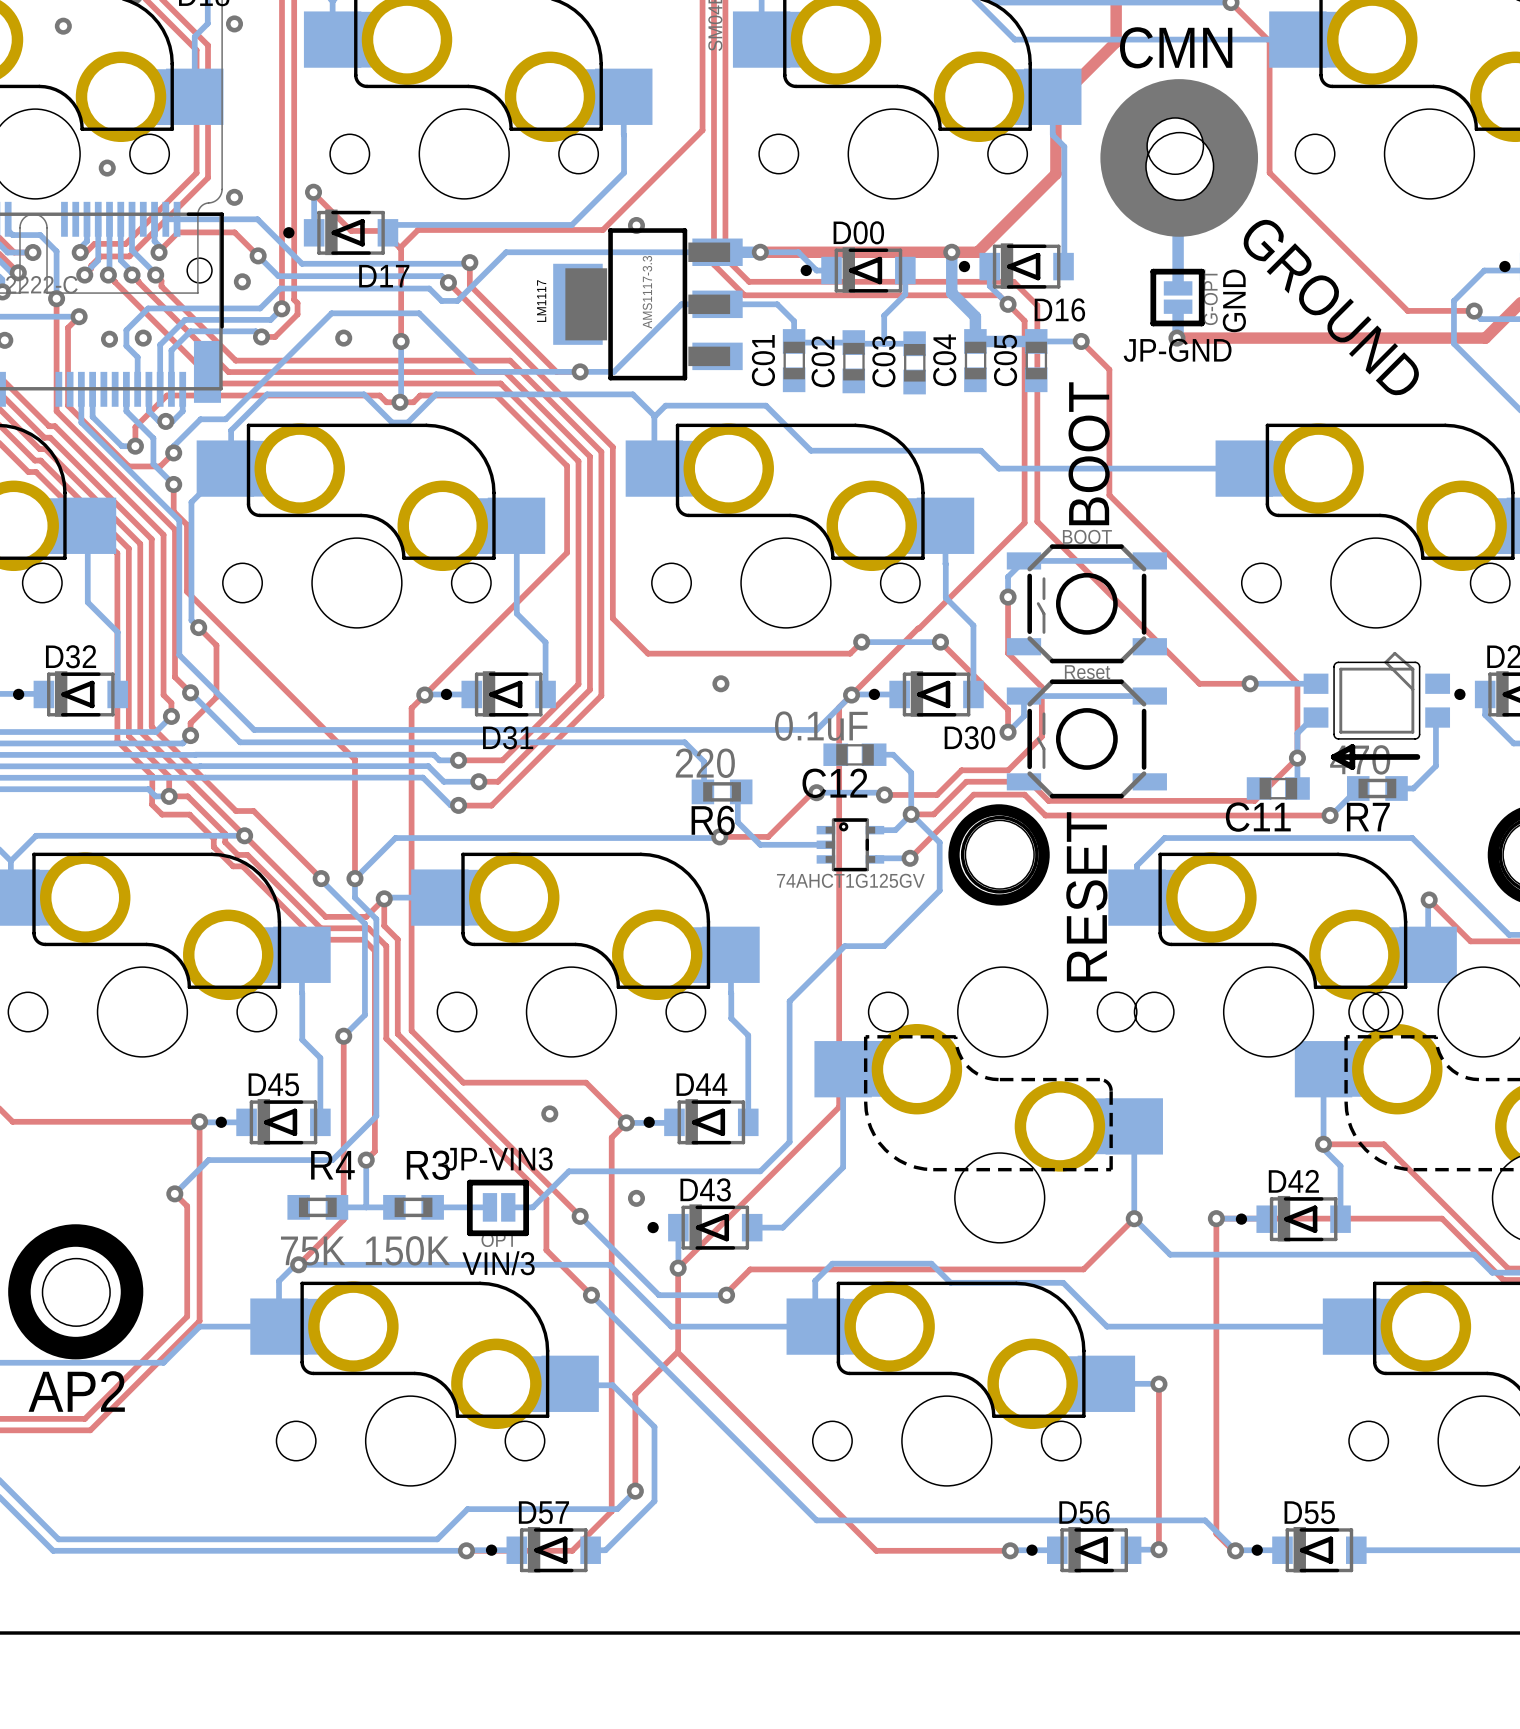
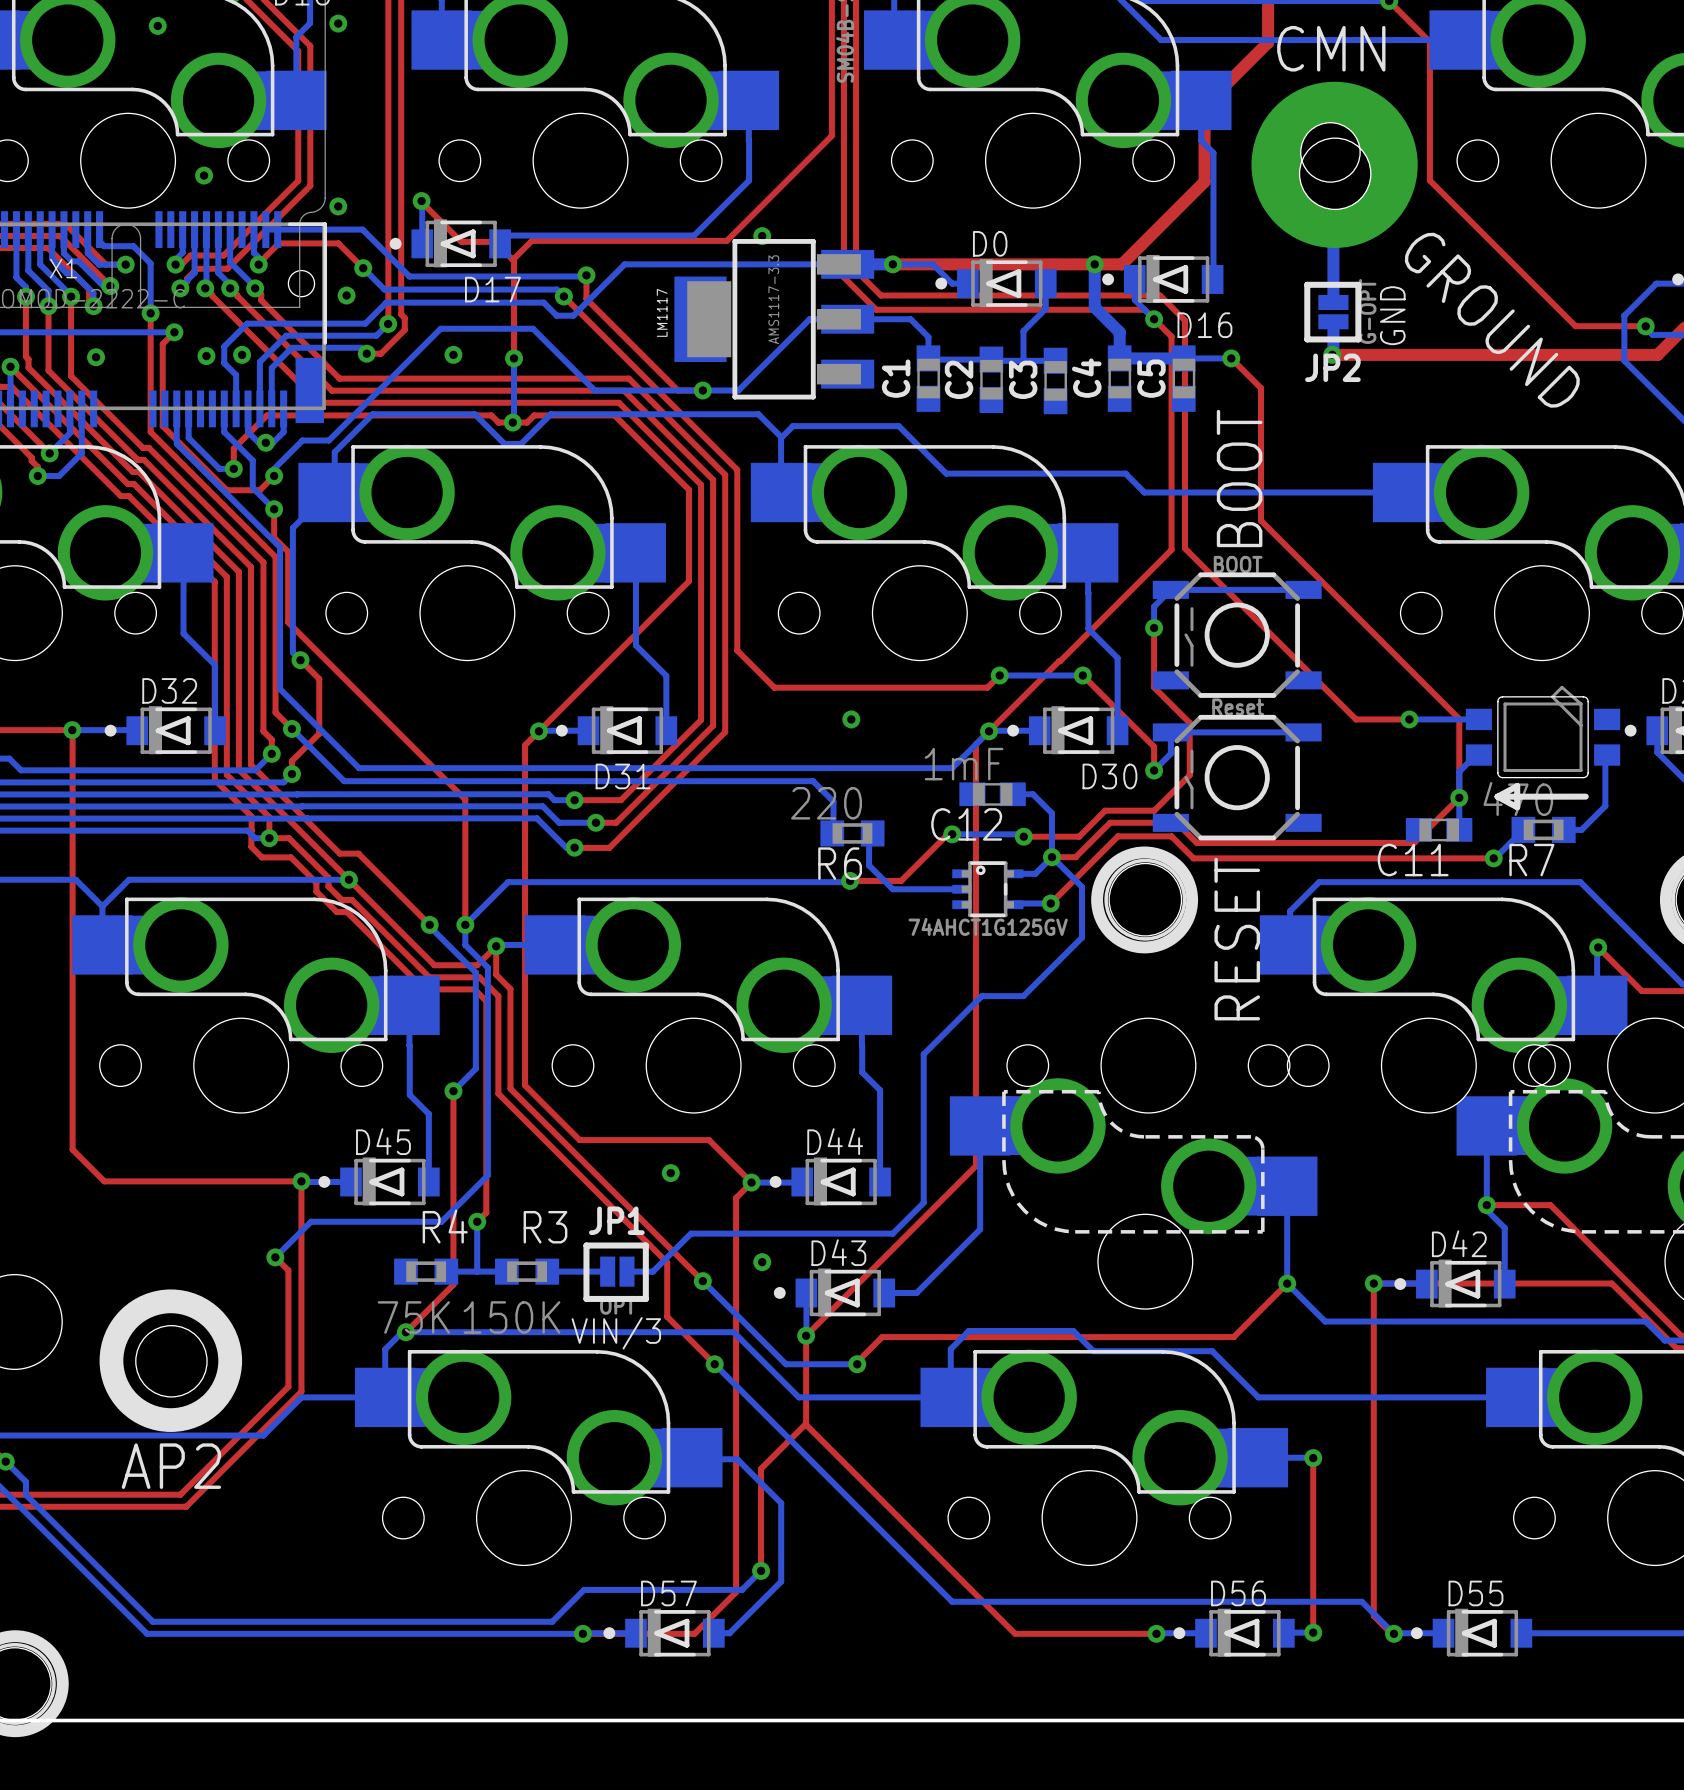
D00 name: D00 (858, 232) -> D0 (990, 243)
JP-GND name: JP-GND (1177, 350) -> JP2 (1332, 367)
C01 name: C01 (763, 360) -> C1 (896, 378)
C04 name: C04 (944, 360) -> C4 (1086, 378)
C05 name: C05 (1005, 360) -> C5 (1151, 378)
C02 name: C02 (823, 361) -> C2 (959, 379)
C03 name: C03 (883, 361) -> C3 (1023, 379)
C12 value: 0.1uF (821, 726) -> 1mF (964, 764)
JP-VIN3 name: JP-VIN3 (498, 1159) -> JP1 (616, 1220)

